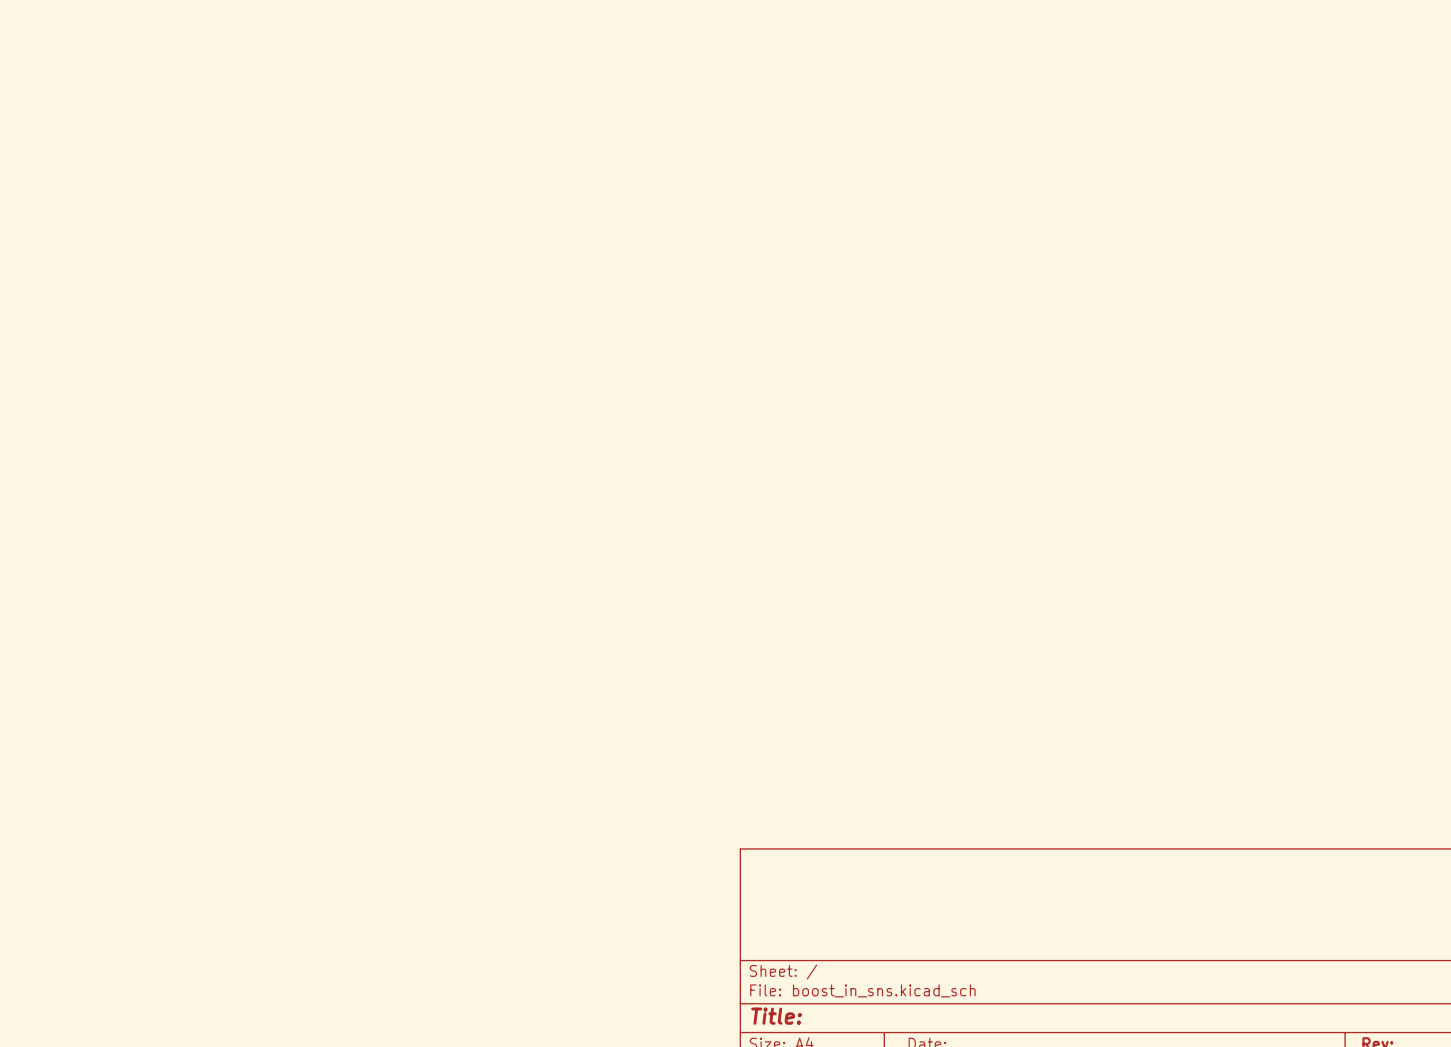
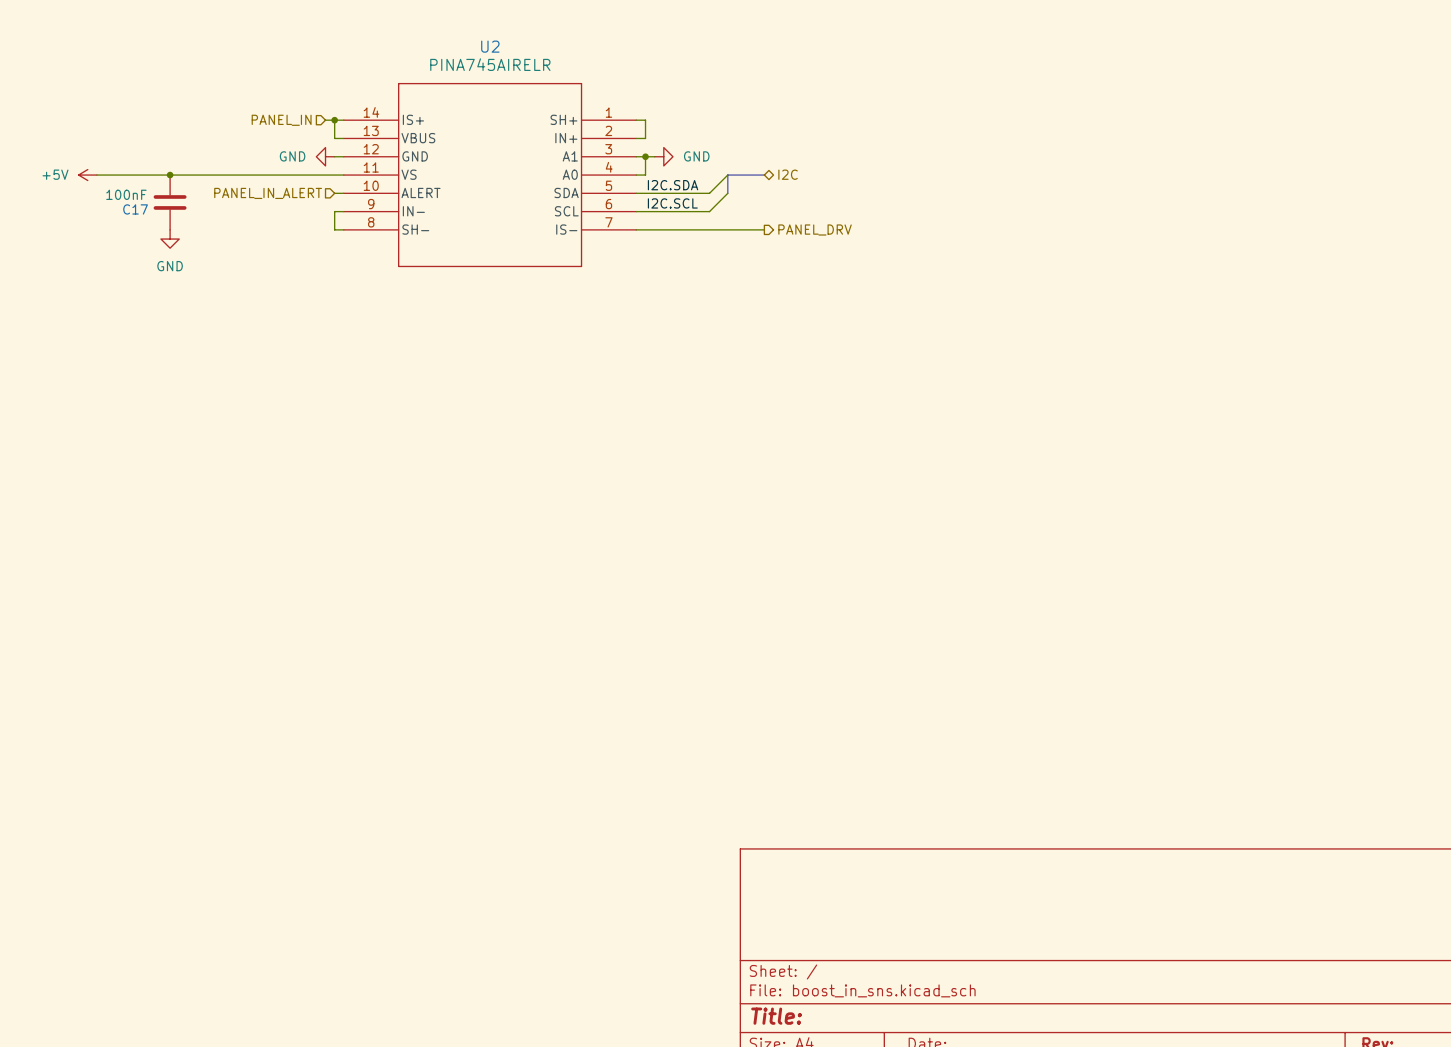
hierarchical label: none -> PANEL_IN (281, 120)
wire: none -> (325, 120) (343, 120)
wire: none -> (334, 120) (334, 138) (343, 138)
junction: none -> (334, 120)
wire: none -> (636, 120) (645, 120) (645, 138) (636, 138)
power symbol: none -> GND (325, 156)
wire: none -> (334, 156) (343, 156)
wire: none -> (636, 156) (654, 156)
wire: none -> (645, 156) (645, 175) (636, 175)
junction: none -> (645, 156)
power symbol: none -> GND (663, 156)
hierarchical label: none -> I2C (788, 174)
power symbol: none -> +5V (87, 175)
wire: none -> (96, 175) (343, 175)
junction: none -> (170, 175)
U2: none -> PINA745AIRELR (490, 175)
wire: none -> (727, 175) (709, 193) (636, 193)
bus: none -> (764, 175) (727, 175) (727, 193)
label: none -> I2C.SDA (673, 185)
hierarchical label: none -> PANEL_IN_ALERT (268, 193)
wire: none -> (334, 193) (343, 193)
wire: none -> (727, 193) (709, 211) (636, 211)
C17: none -> 100nF (170, 202)
label: none -> I2C.SCL (672, 203)
wire: none -> (343, 211) (334, 211) (334, 229) (343, 229)
wire: none -> (636, 229) (764, 229)
hierarchical label: none -> PANEL_DRV (815, 229)
power symbol: none -> GND (170, 239)

